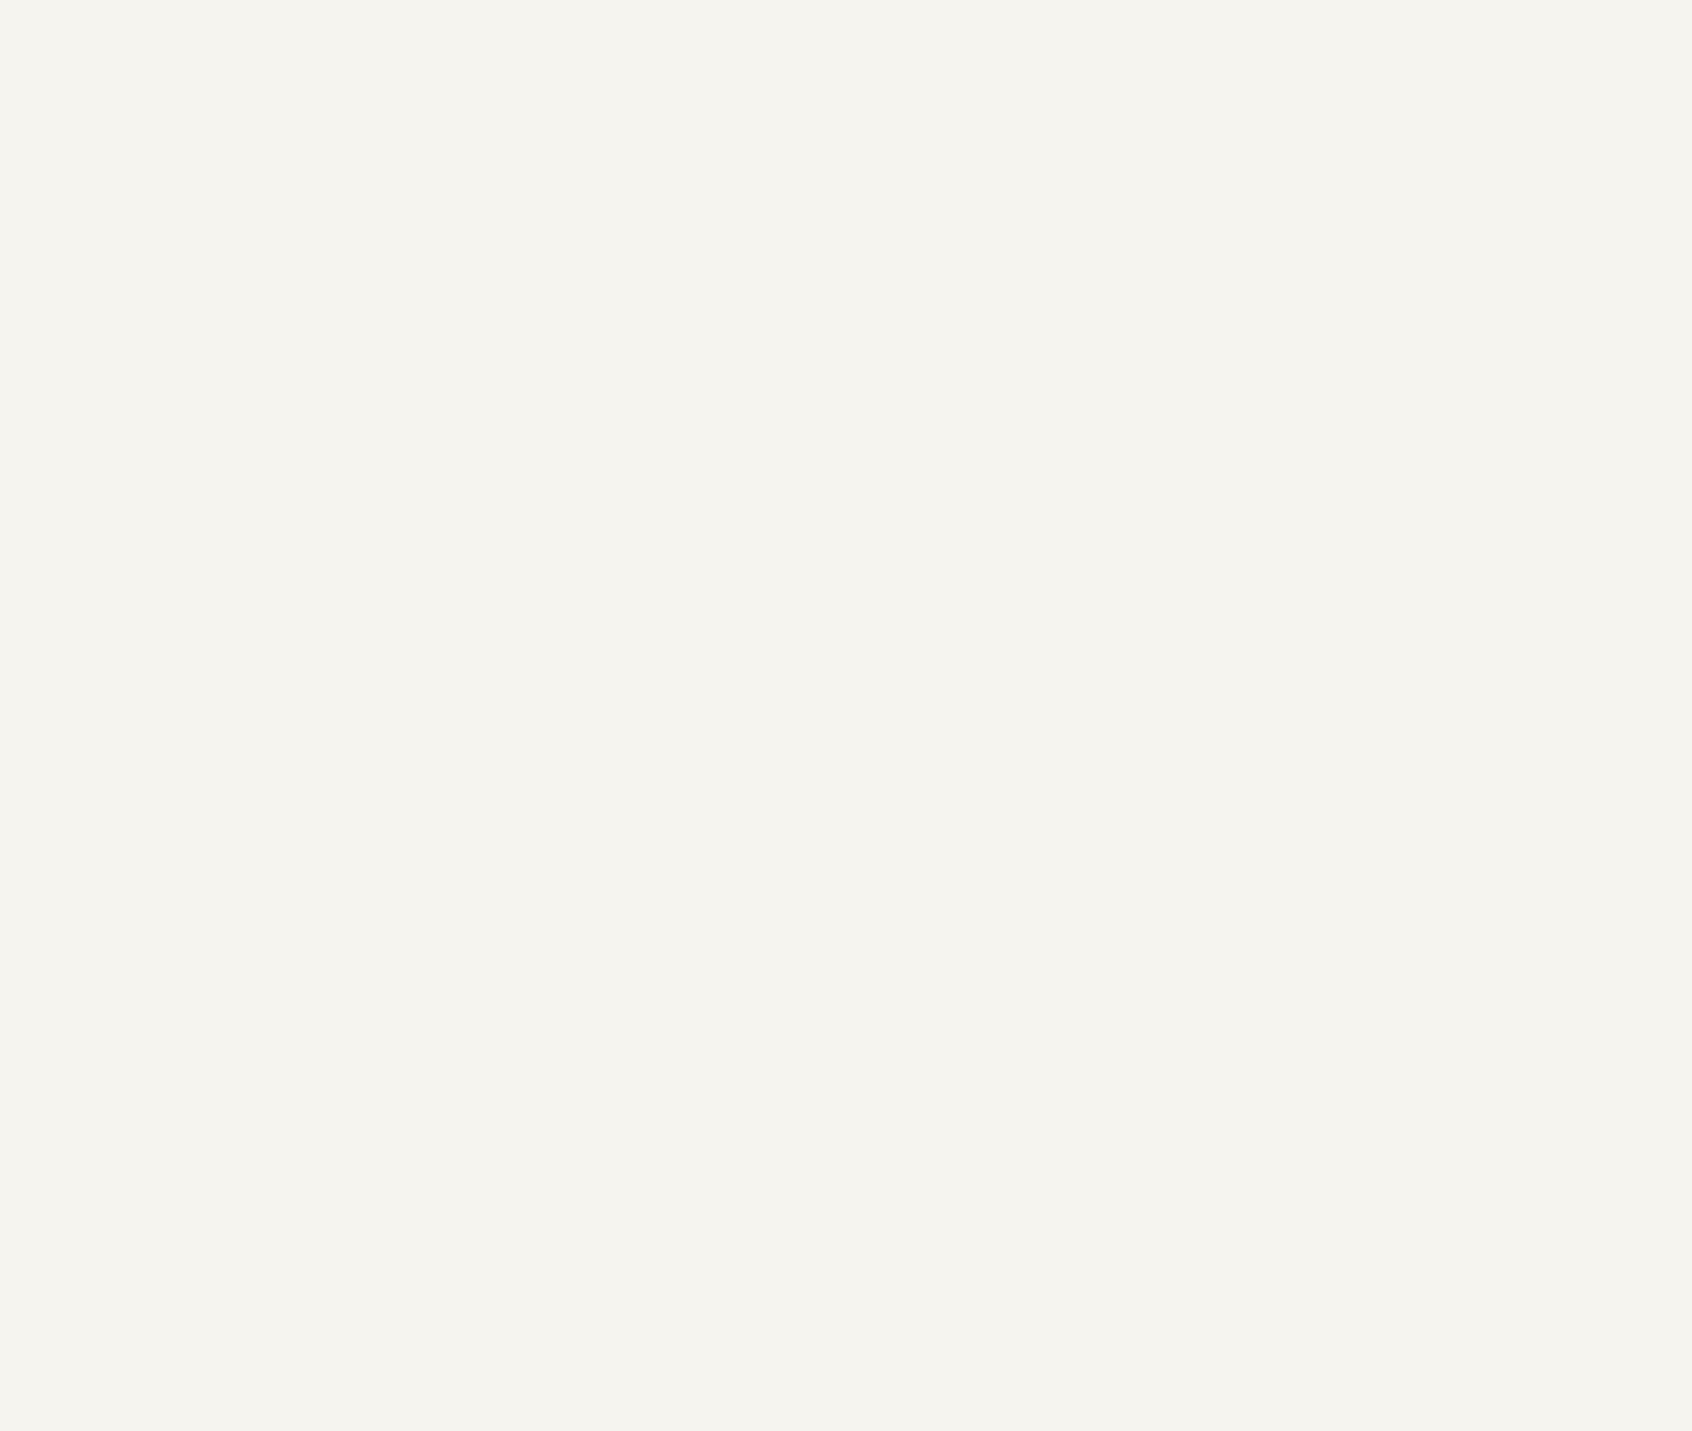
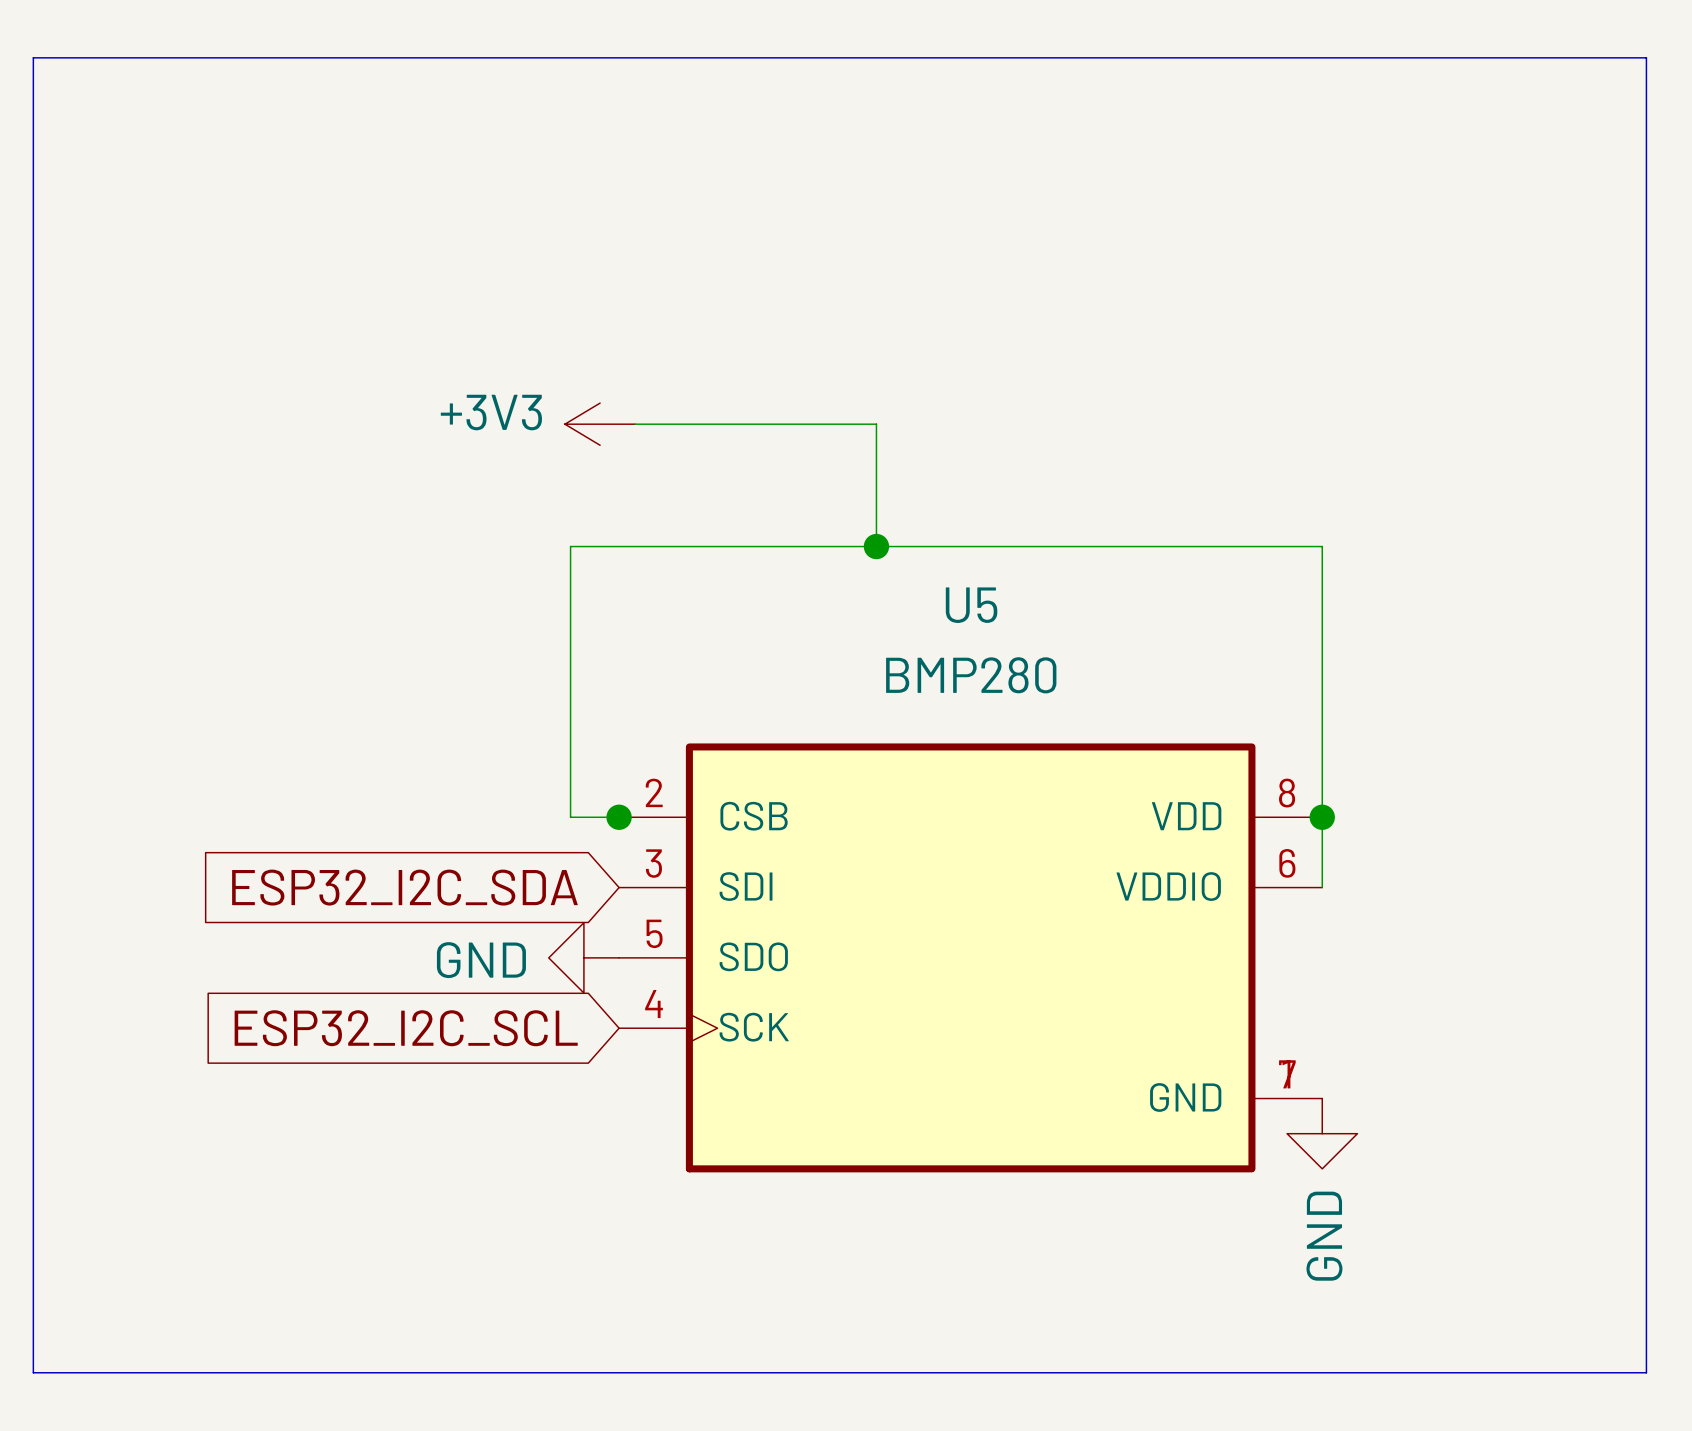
line: none -> (33, 57) (1646, 57) (1646, 1372) (33, 1372) (33, 57)
power symbol: none -> +3V3 (600, 424)
wire: none -> (635, 424) (876, 424) (876, 546)
junction: none -> (876, 546)
wire: none -> (619, 817) (570, 817) (570, 546) (1322, 546) (1322, 887)
junction: none -> (619, 817)
junction: none -> (1322, 817)
global label: none -> ESP32_I2C_SDA (404, 887)
power symbol: none -> GND (583, 957)
U5: none -> BMP280 (970, 957)
global label: none -> ESP32_I2C_SCL (406, 1028)
power symbol: none -> GND (1322, 1133)

